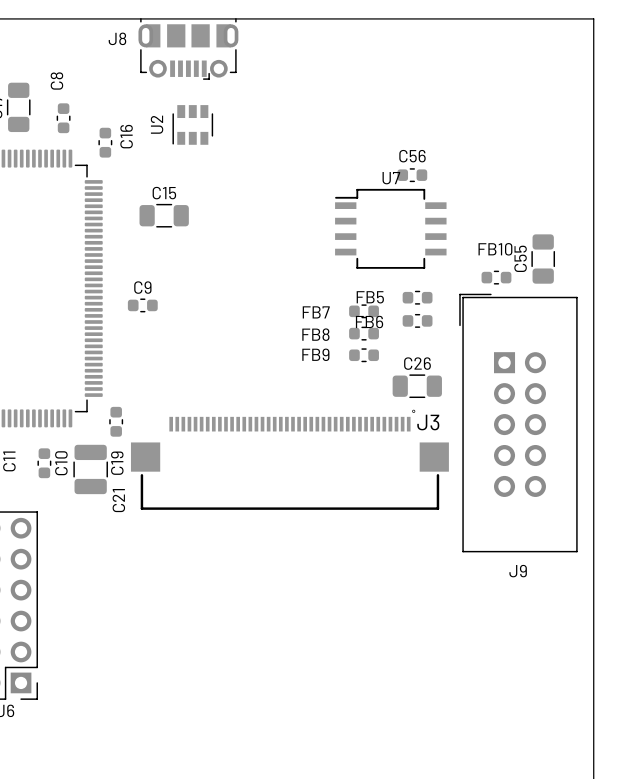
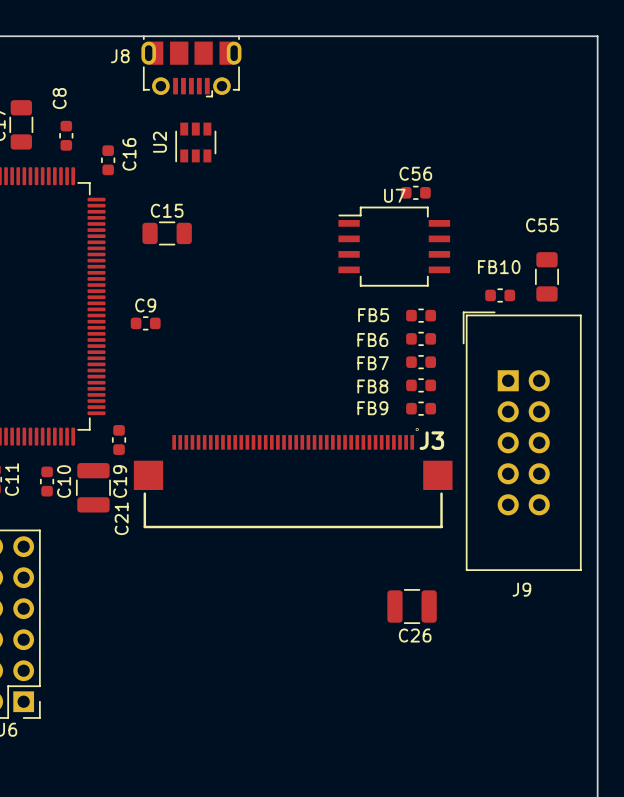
C55 name rotation: 0° (520, 258) -> 90° clockwise (542, 225)
C55 name position: C55 (520, 258) -> C55 (542, 225)
FB7 position: (364, 311) -> (421, 362)
FB8 position: (364, 333) -> (421, 385)
FB9 position: (364, 355) -> (421, 408)
C26 name position: C26 (417, 363) -> C26 (415, 635)
C26 footprint: [392, 374, 442, 399] -> [387, 589, 437, 624]

